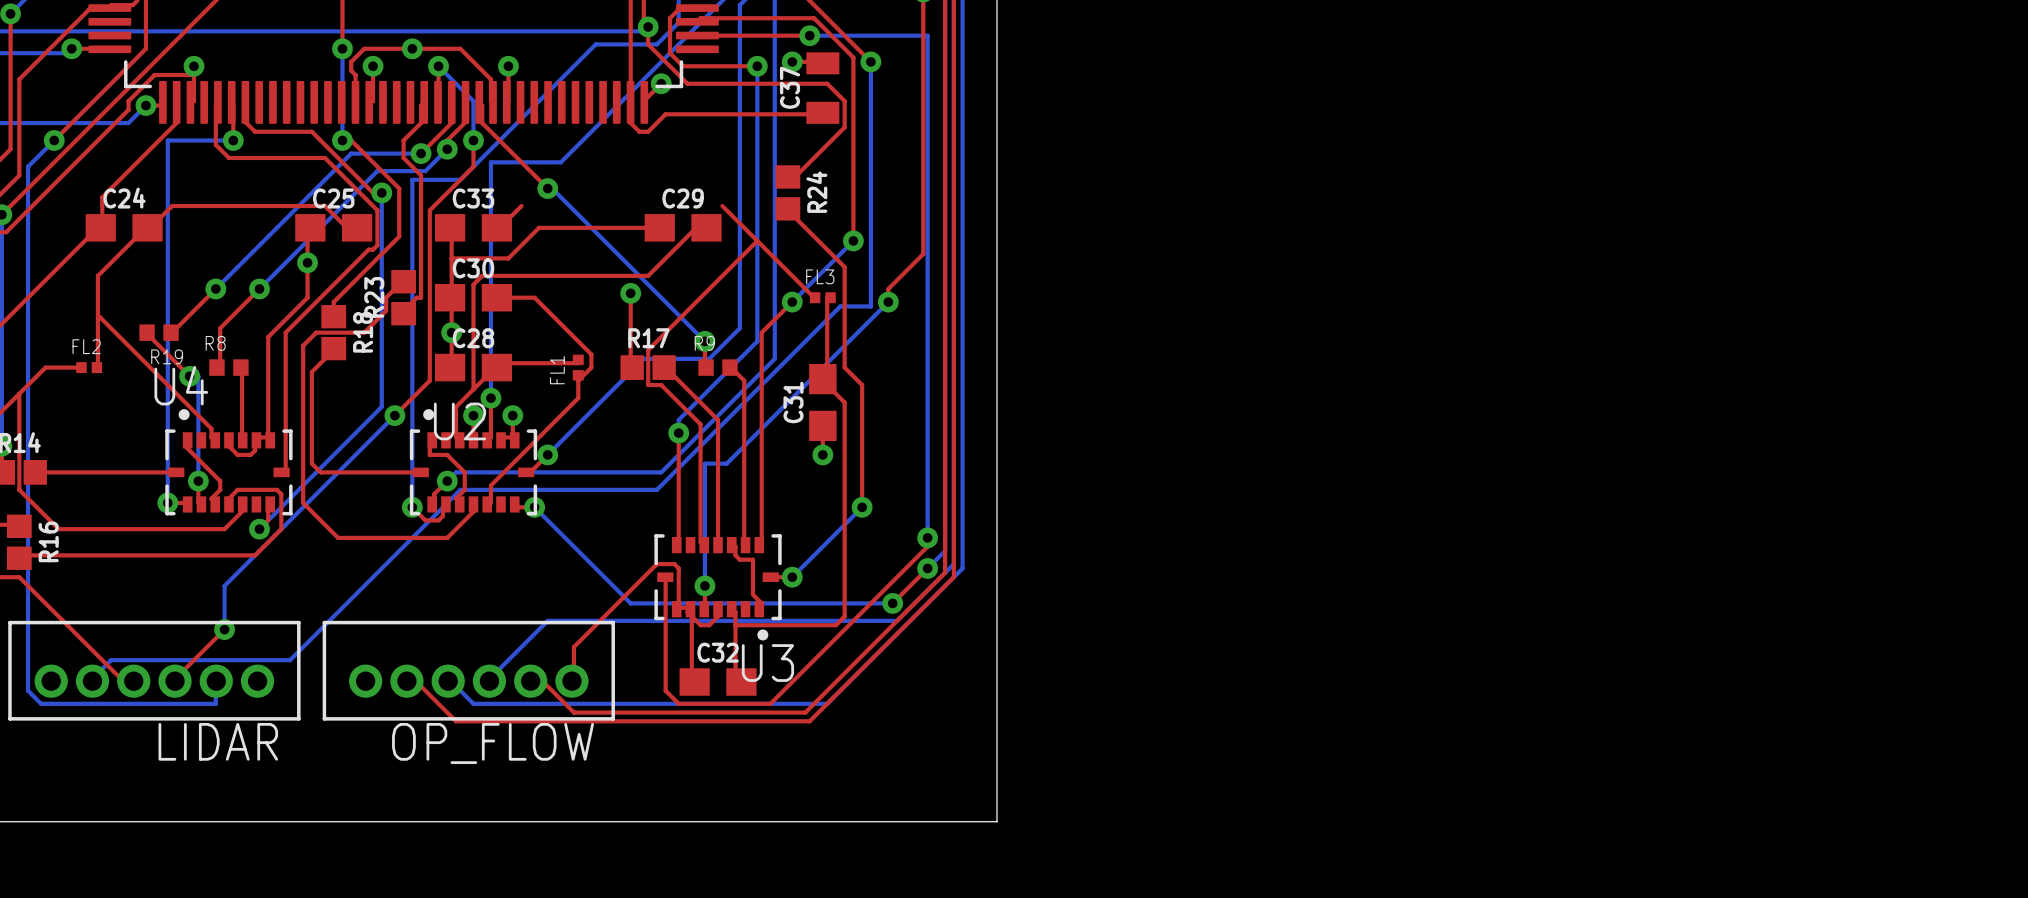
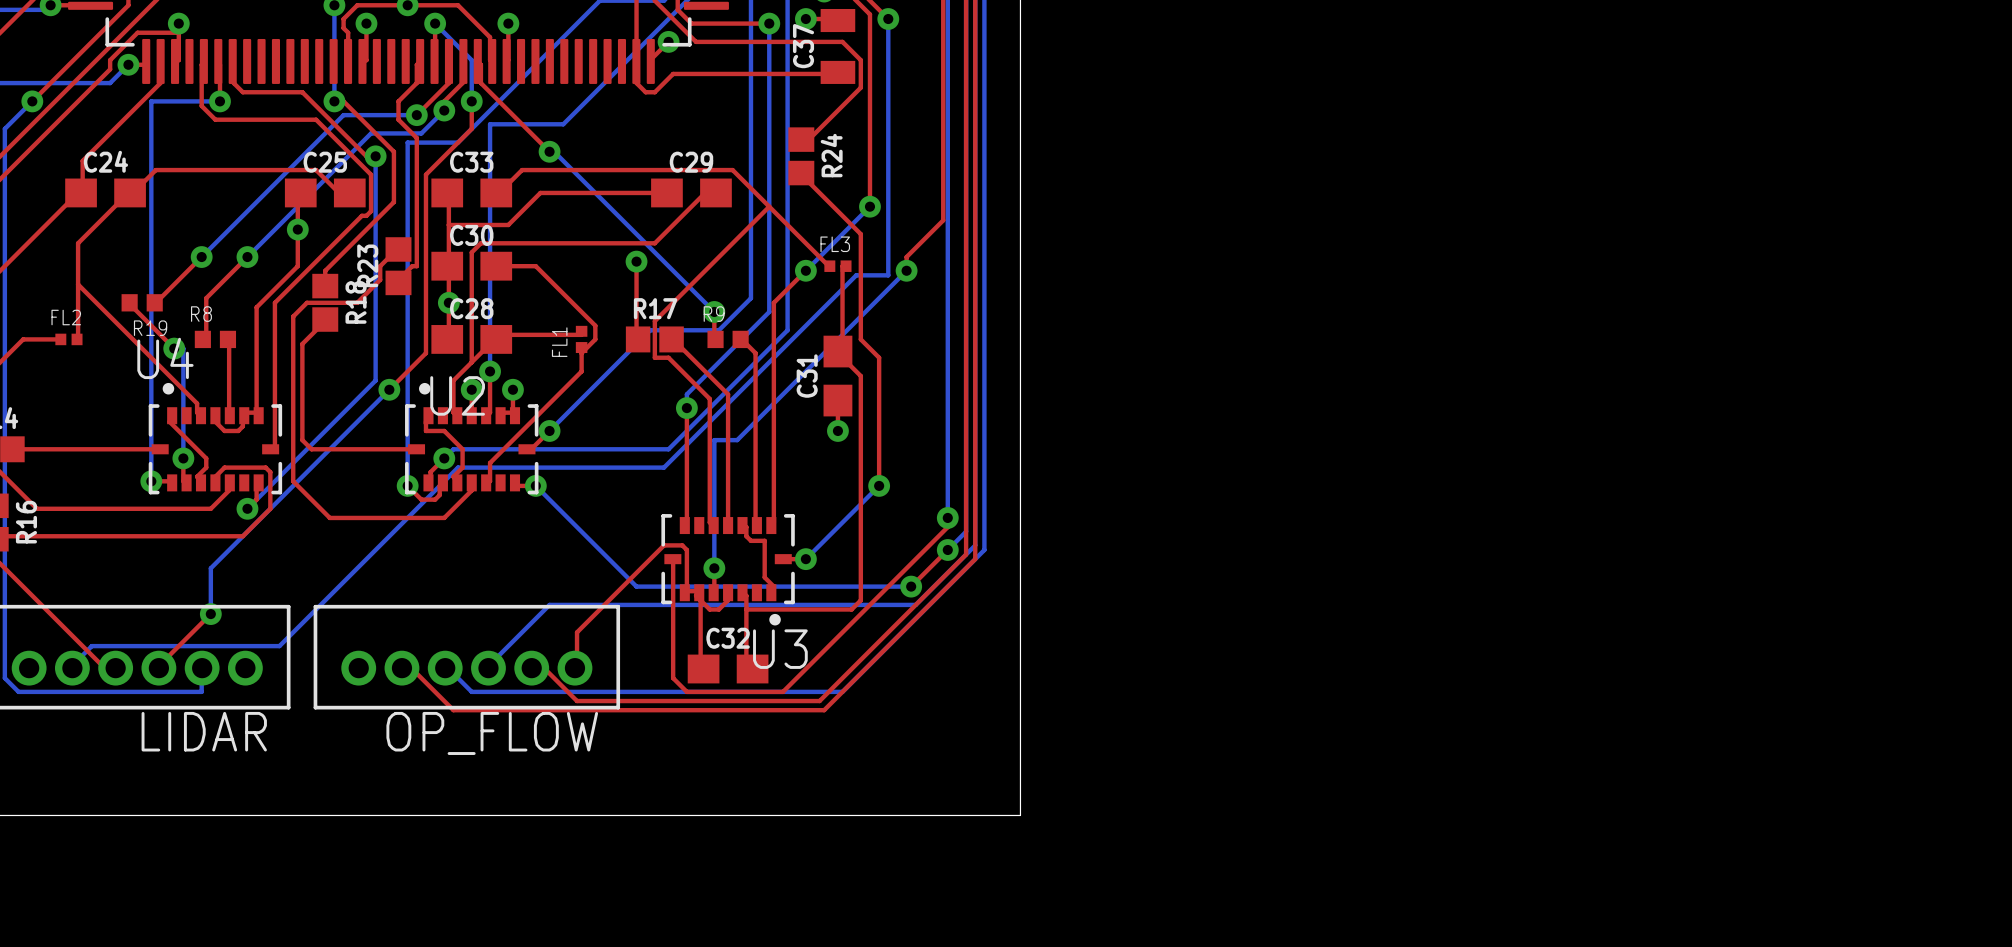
top track: none -> (522, 170) (732, 170)

